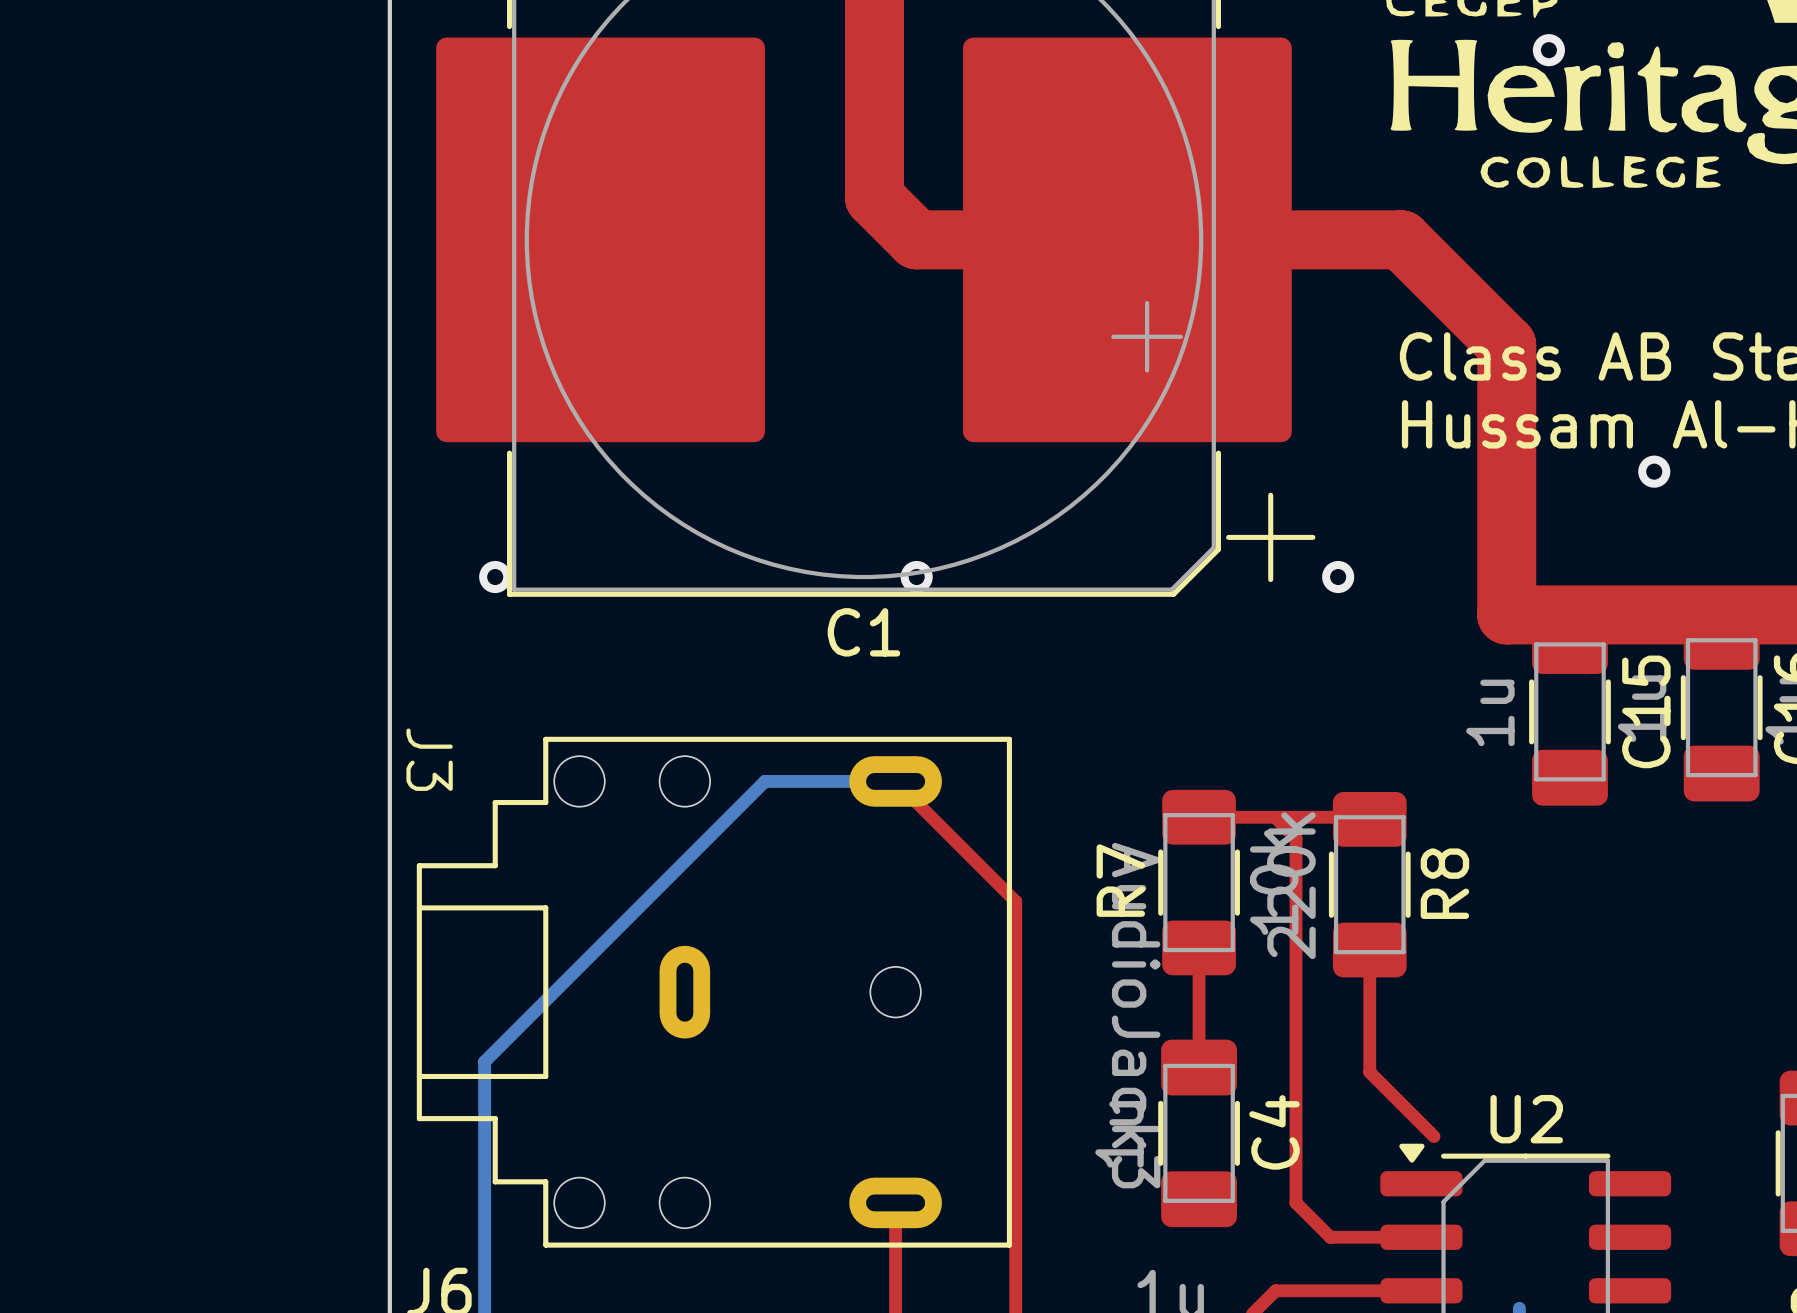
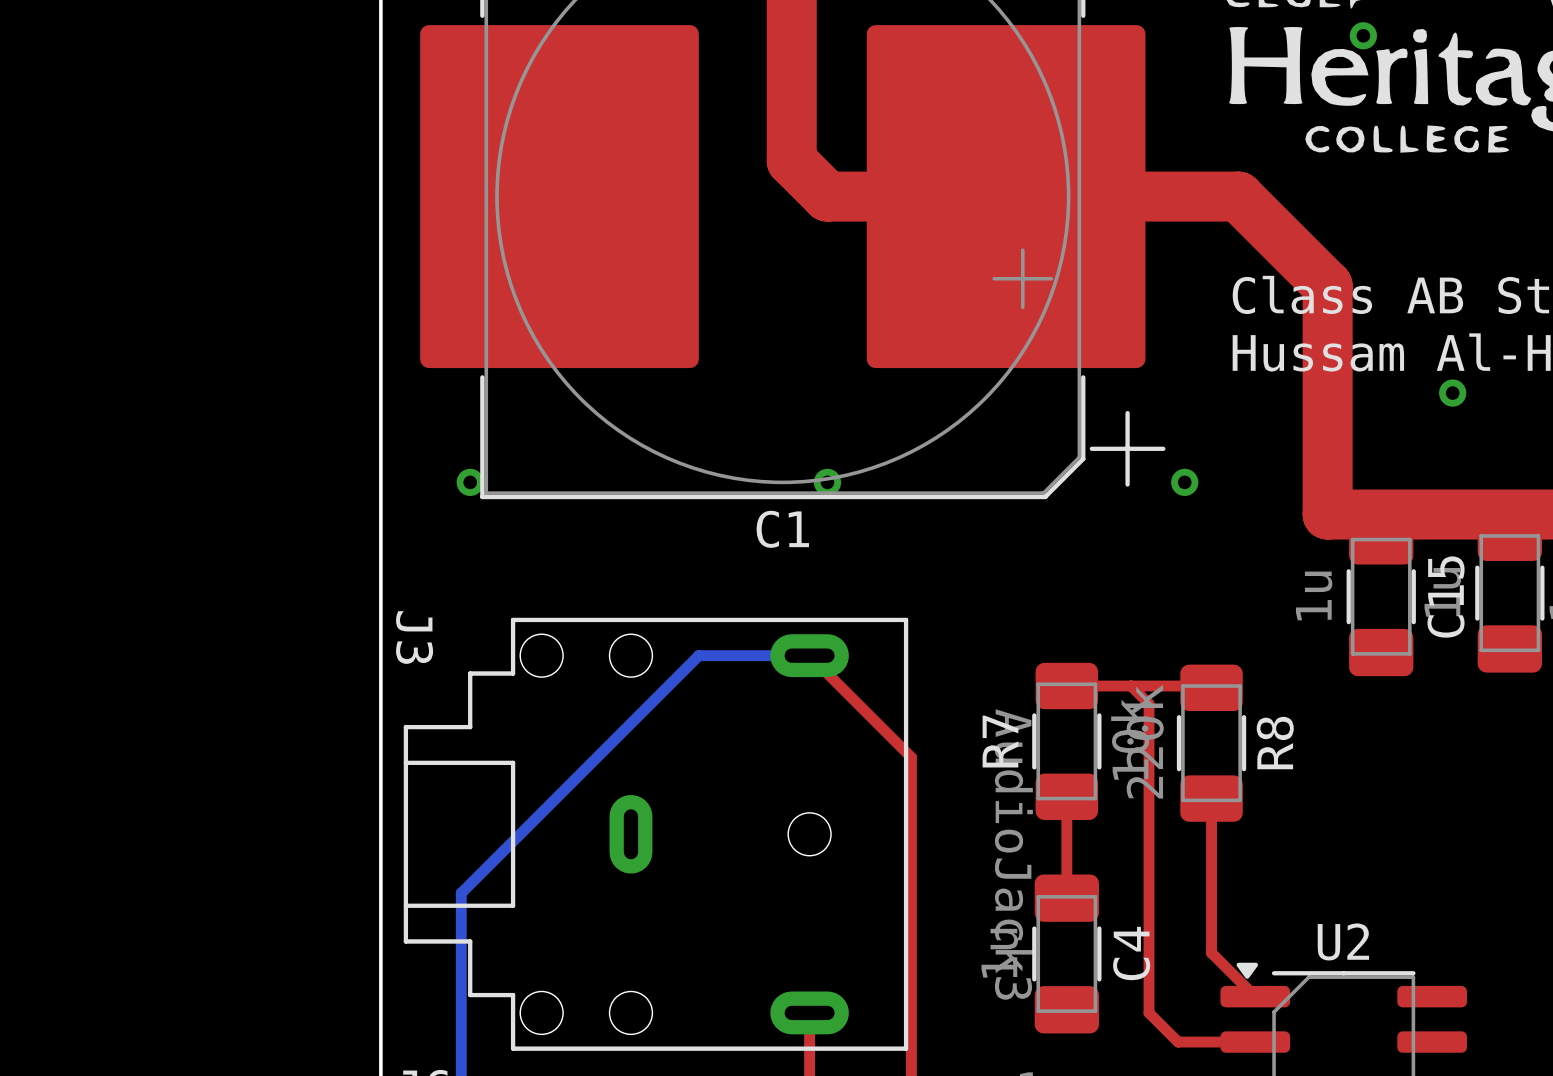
top track: (1369, 1072) (1434, 1136) -> (1211, 902) (1211, 952) (1255, 996)

